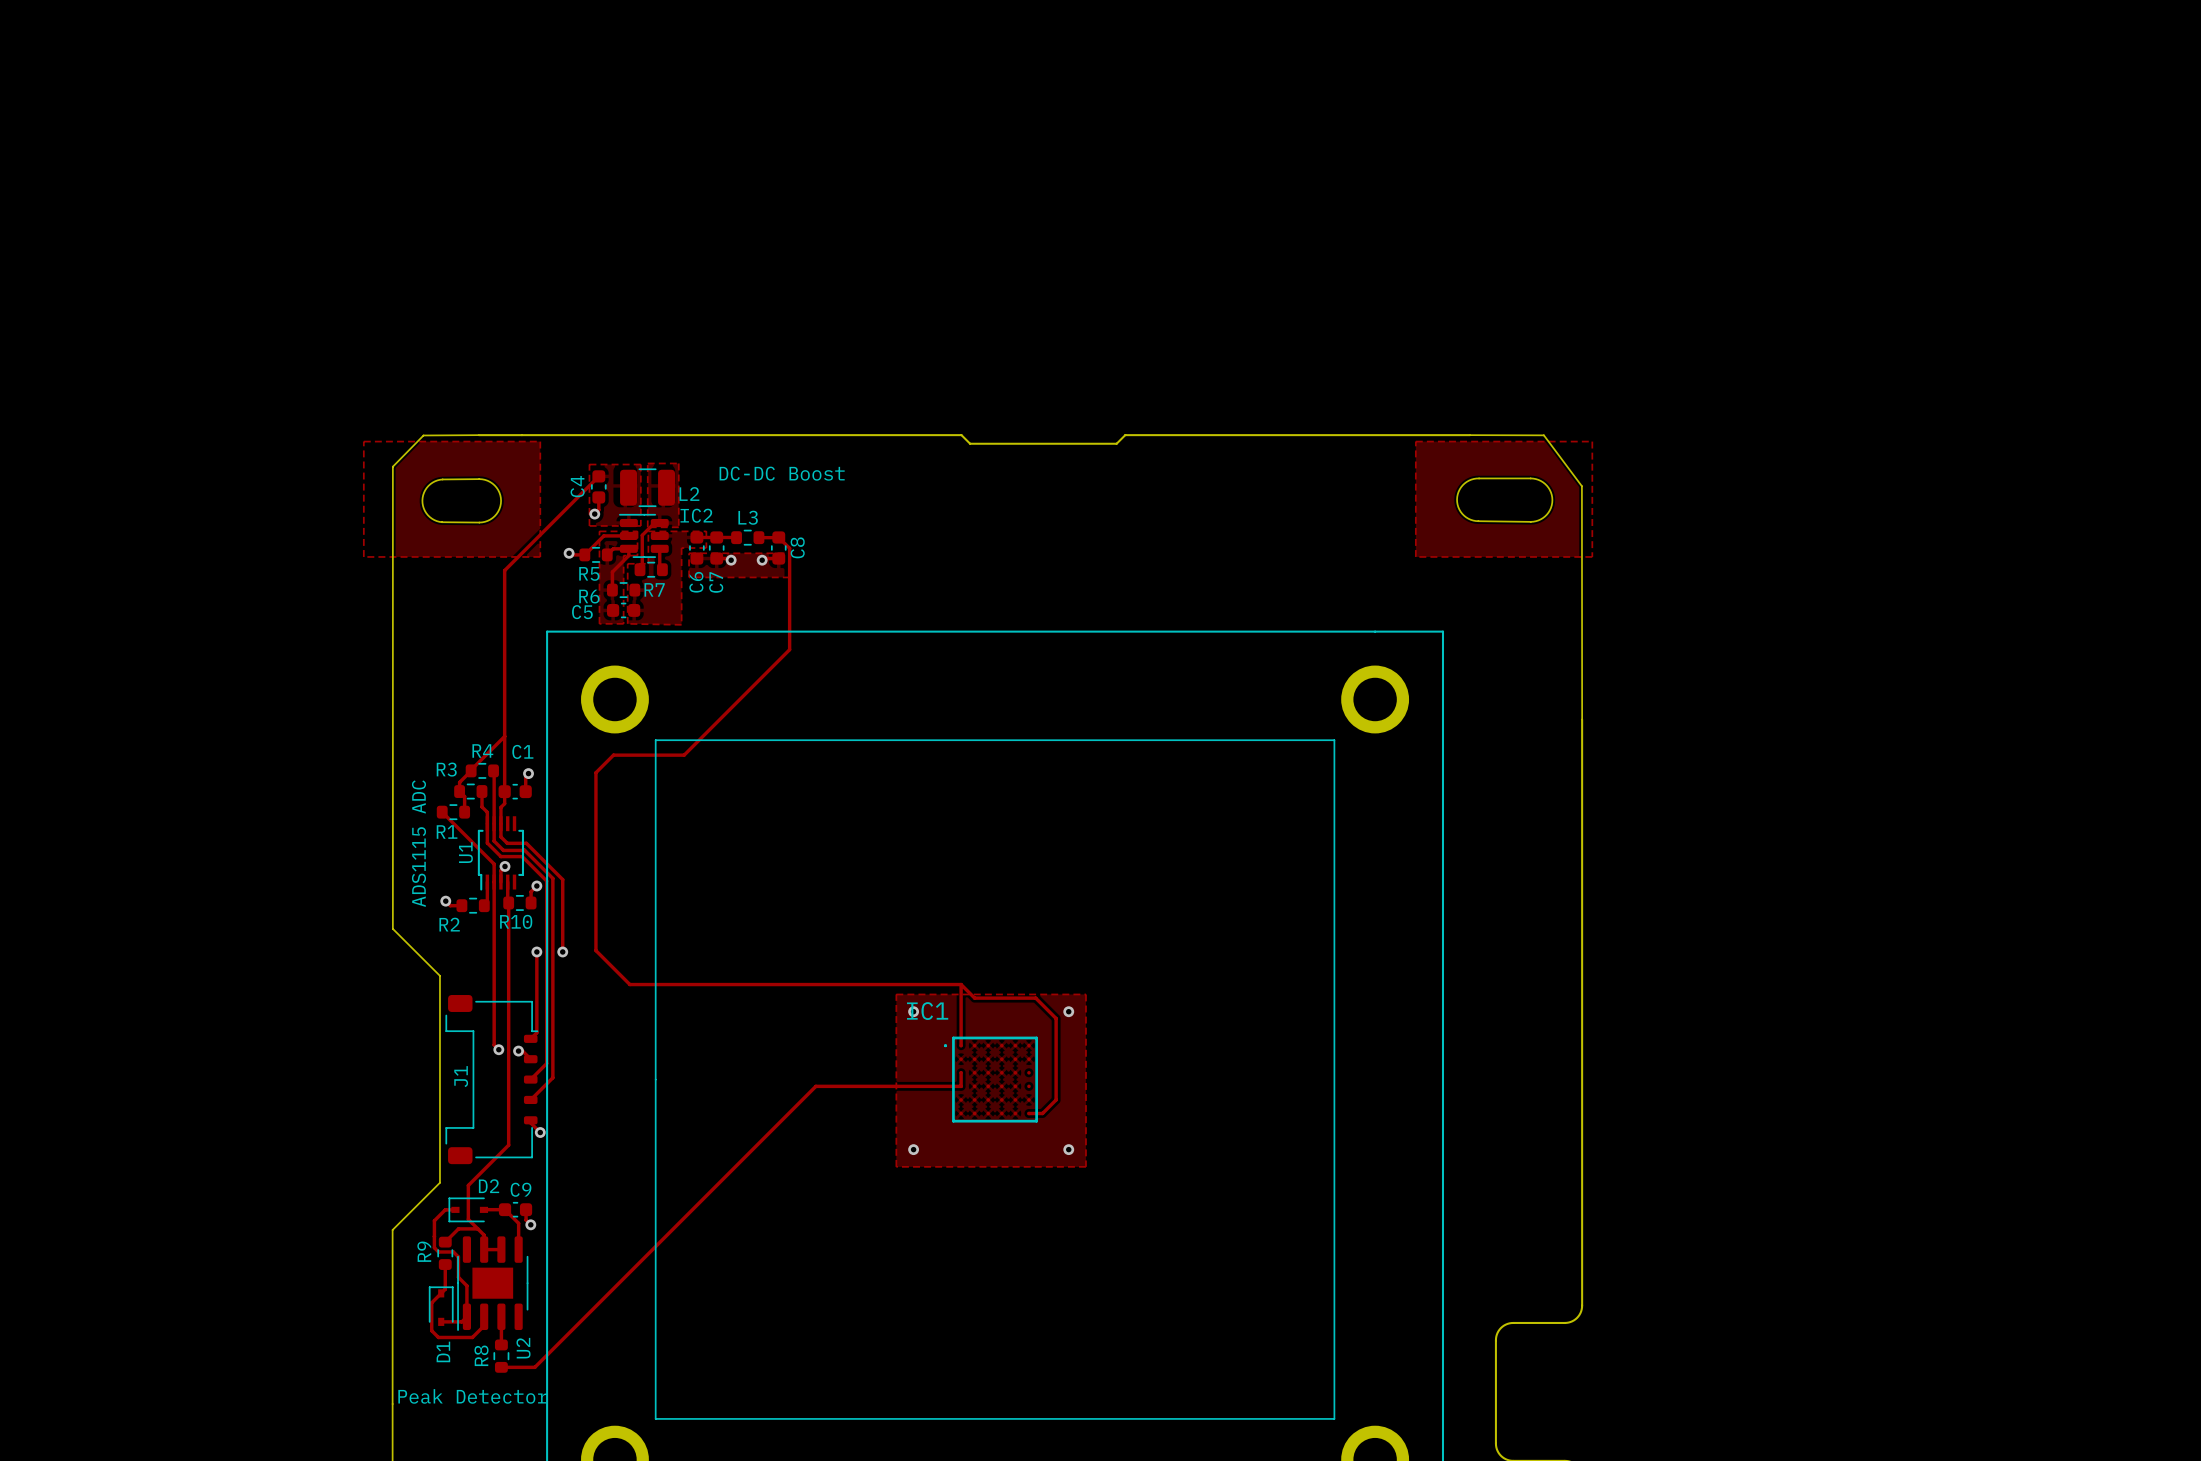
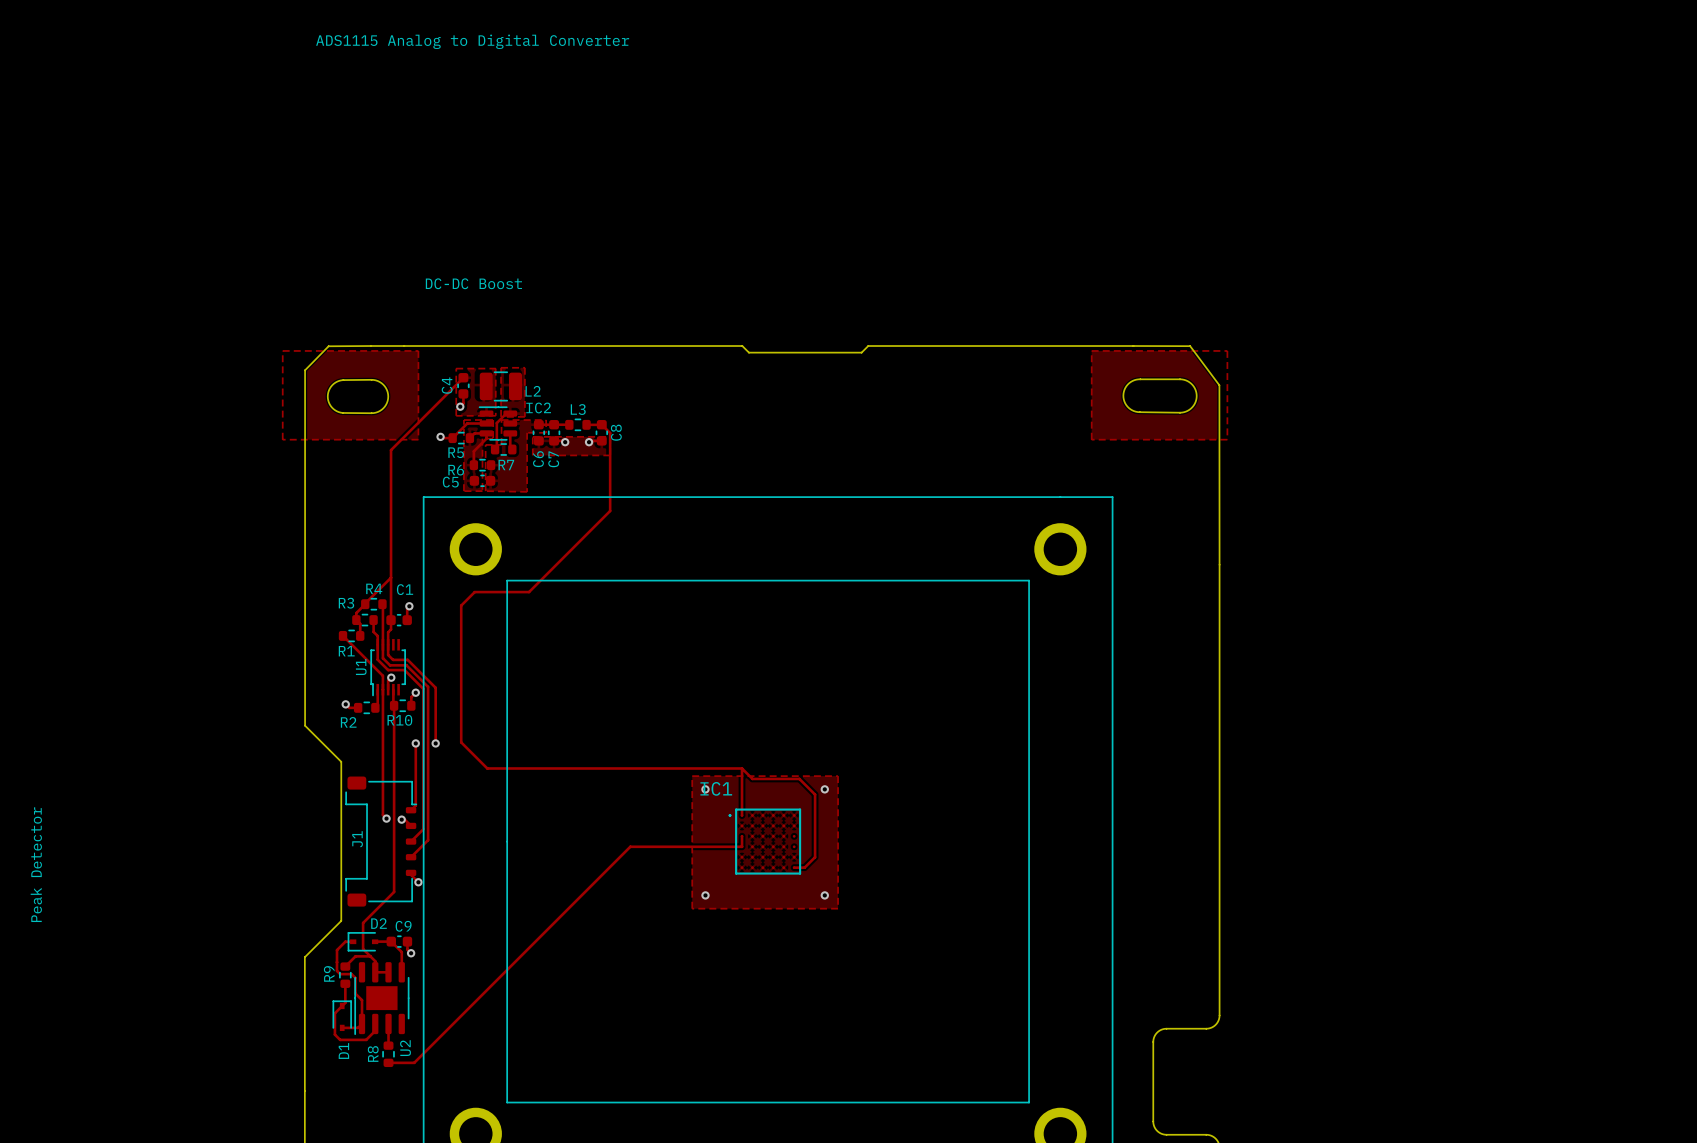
text: none -> ADS1115 Analog to Digital Converter (472, 41)
text position: DC-DC Boost (782, 473) -> DC-DC Boost (473, 283)
text: ADS1115 ADC (418, 843) -> none
text: none -> Peak Detector (36, 864)
text: Peak Detector (472, 1396) -> none

